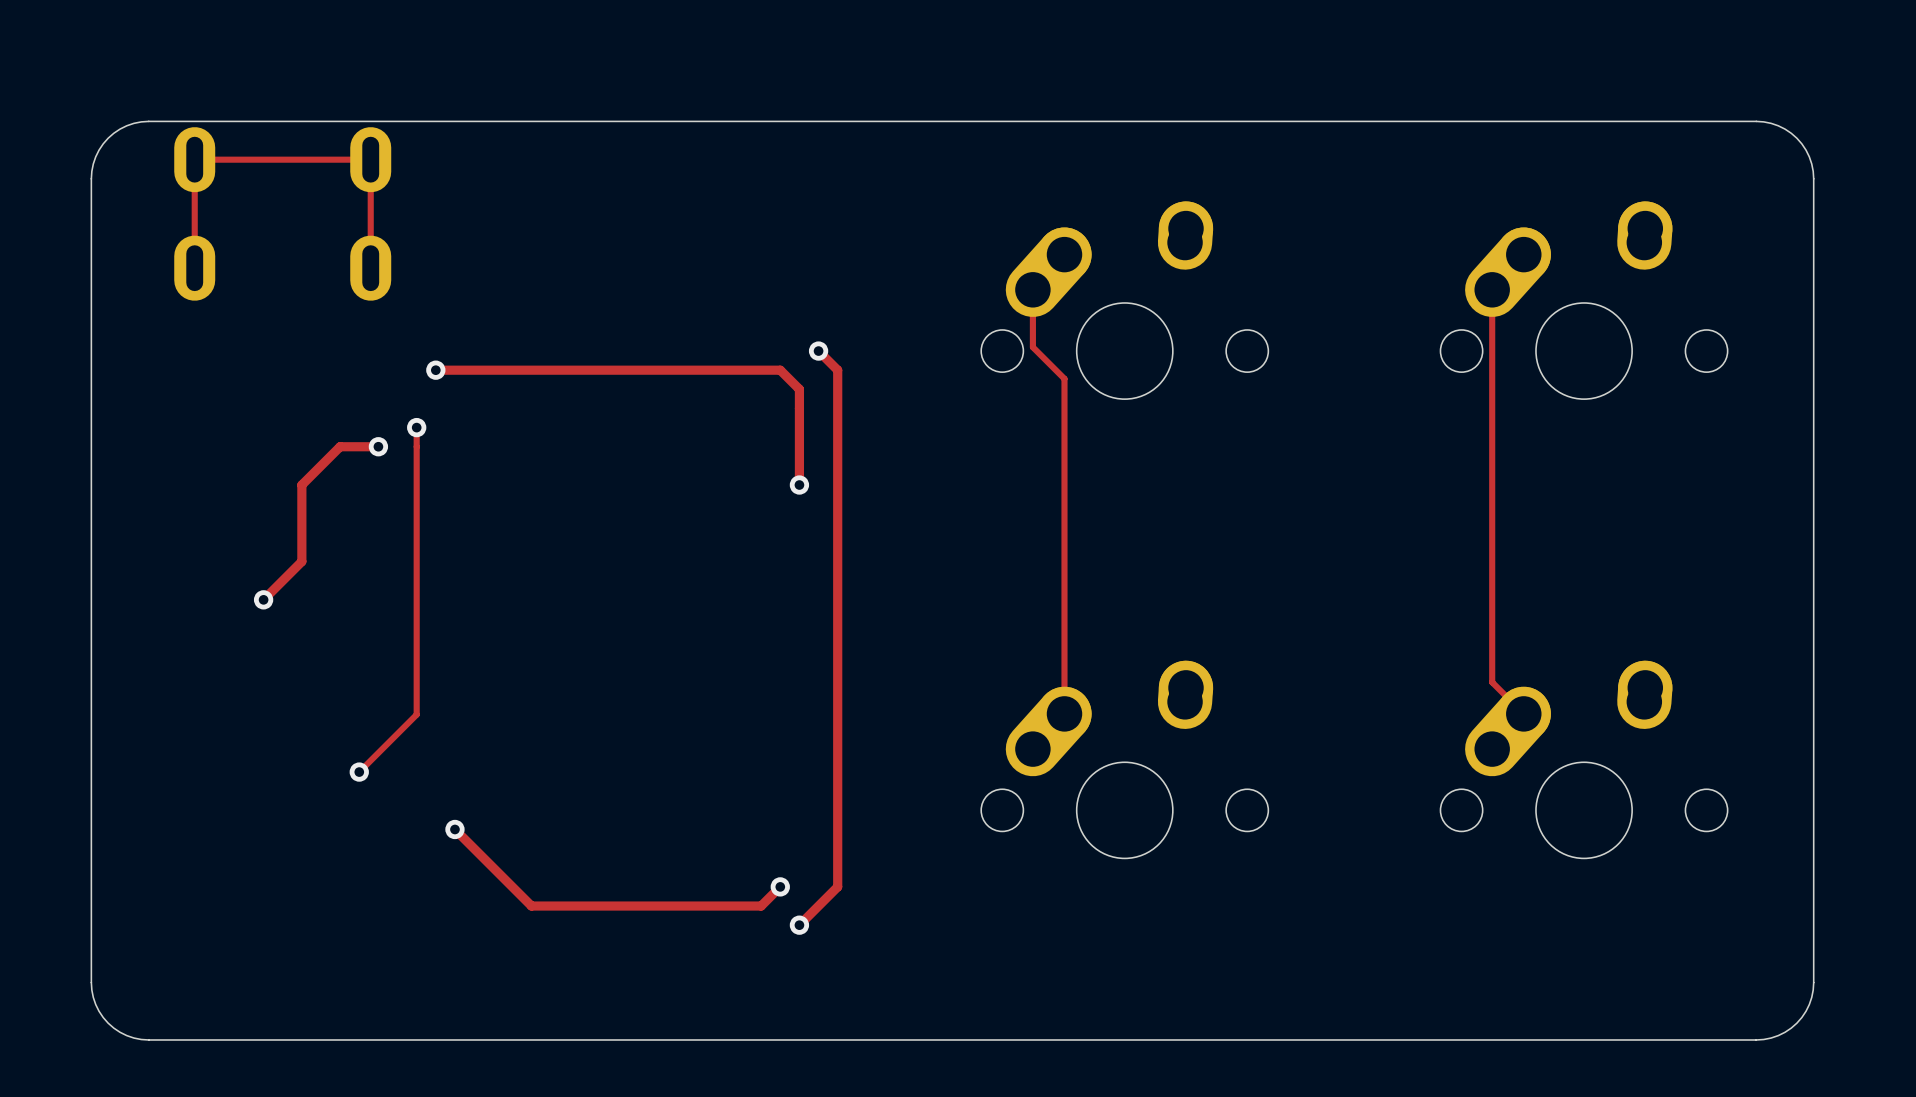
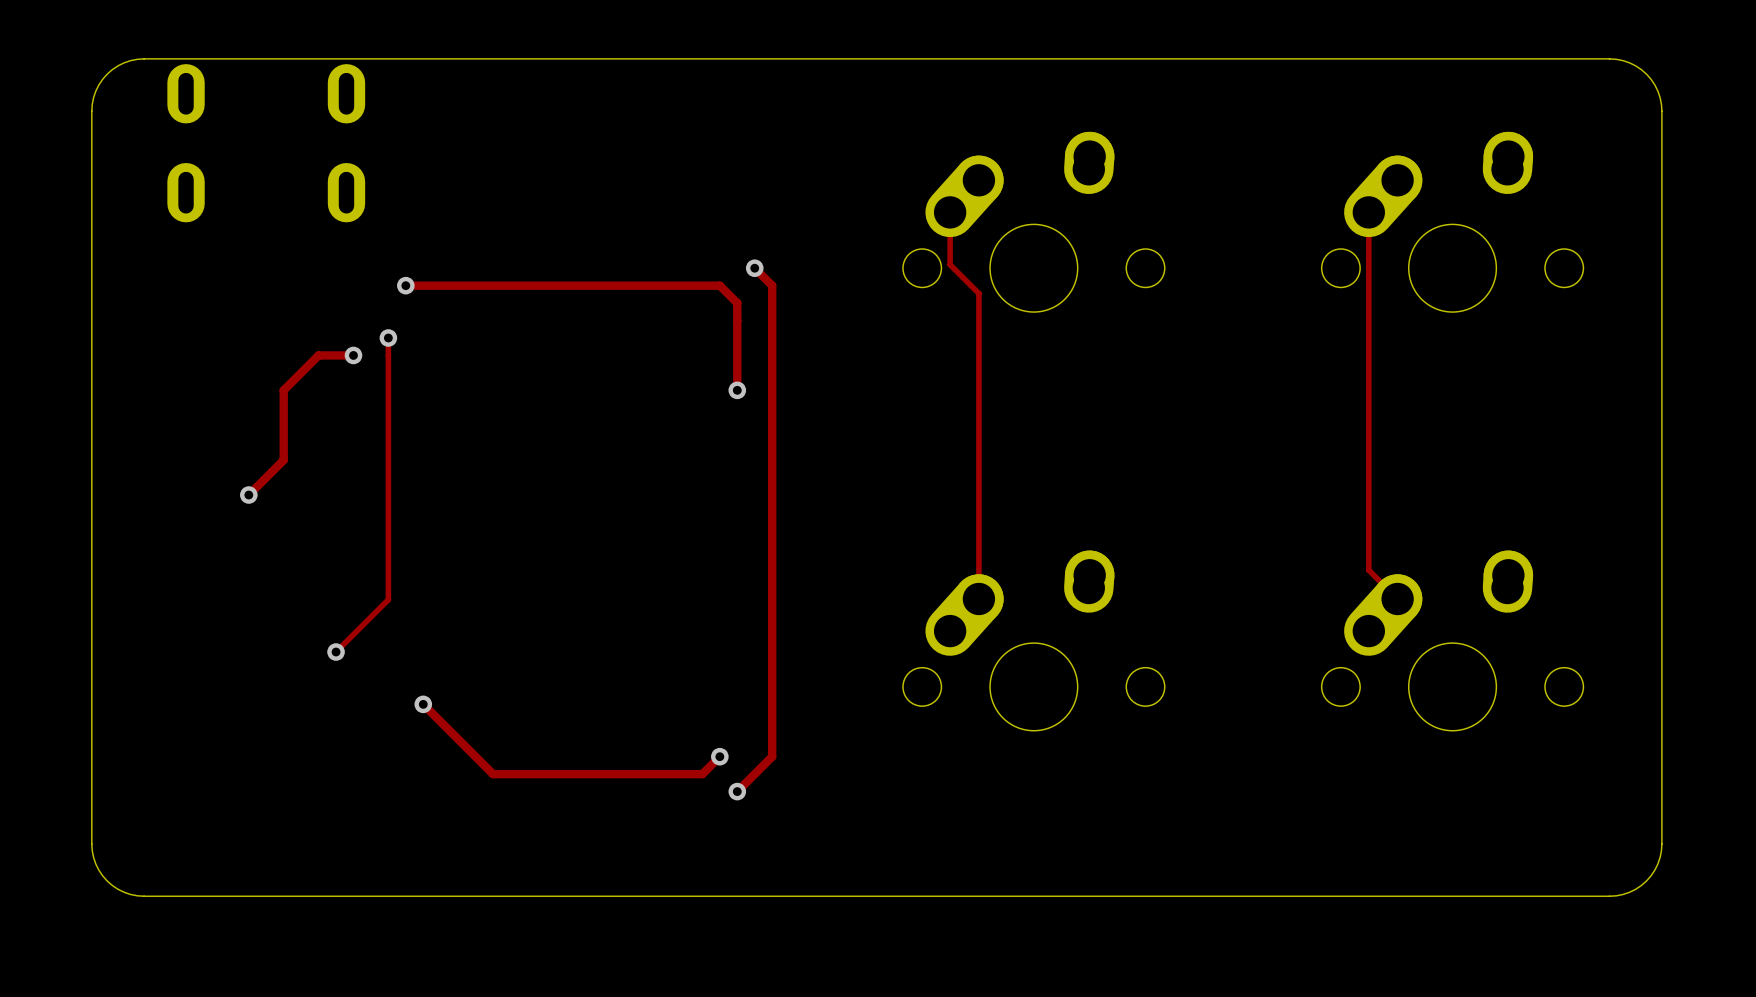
track: (194, 268) (194, 159) (370, 159) (370, 268) -> none

